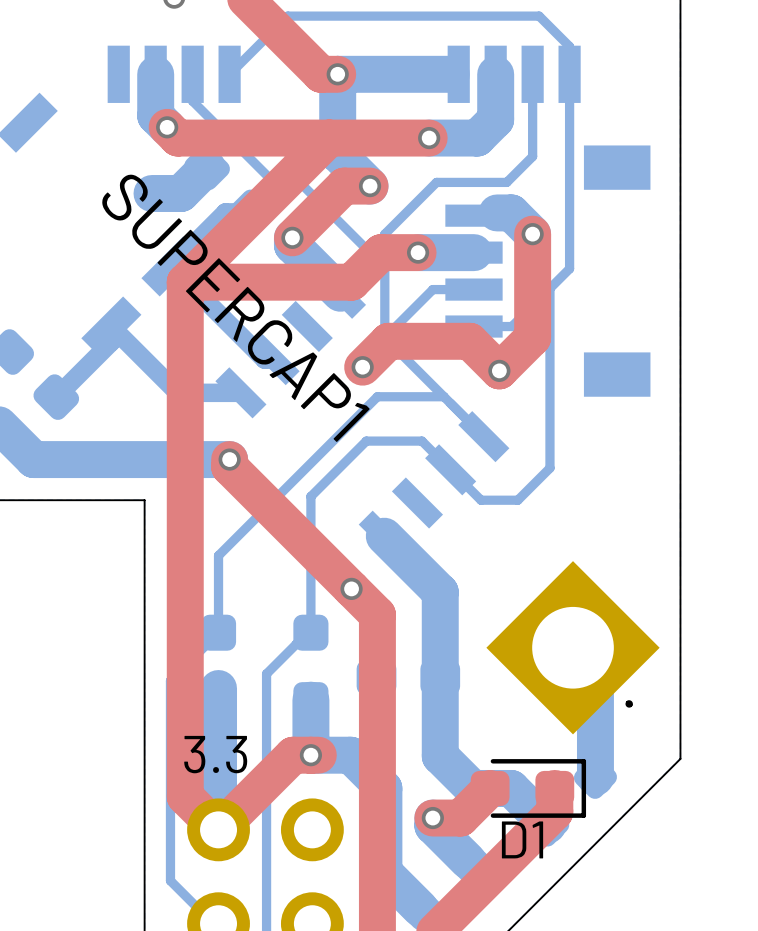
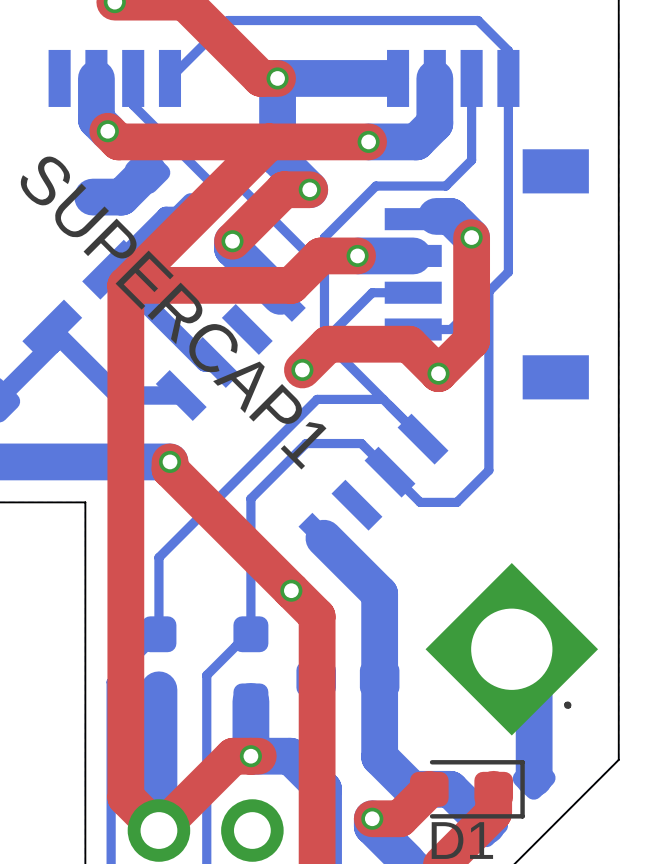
text: 3.3 (215, 754) -> none

